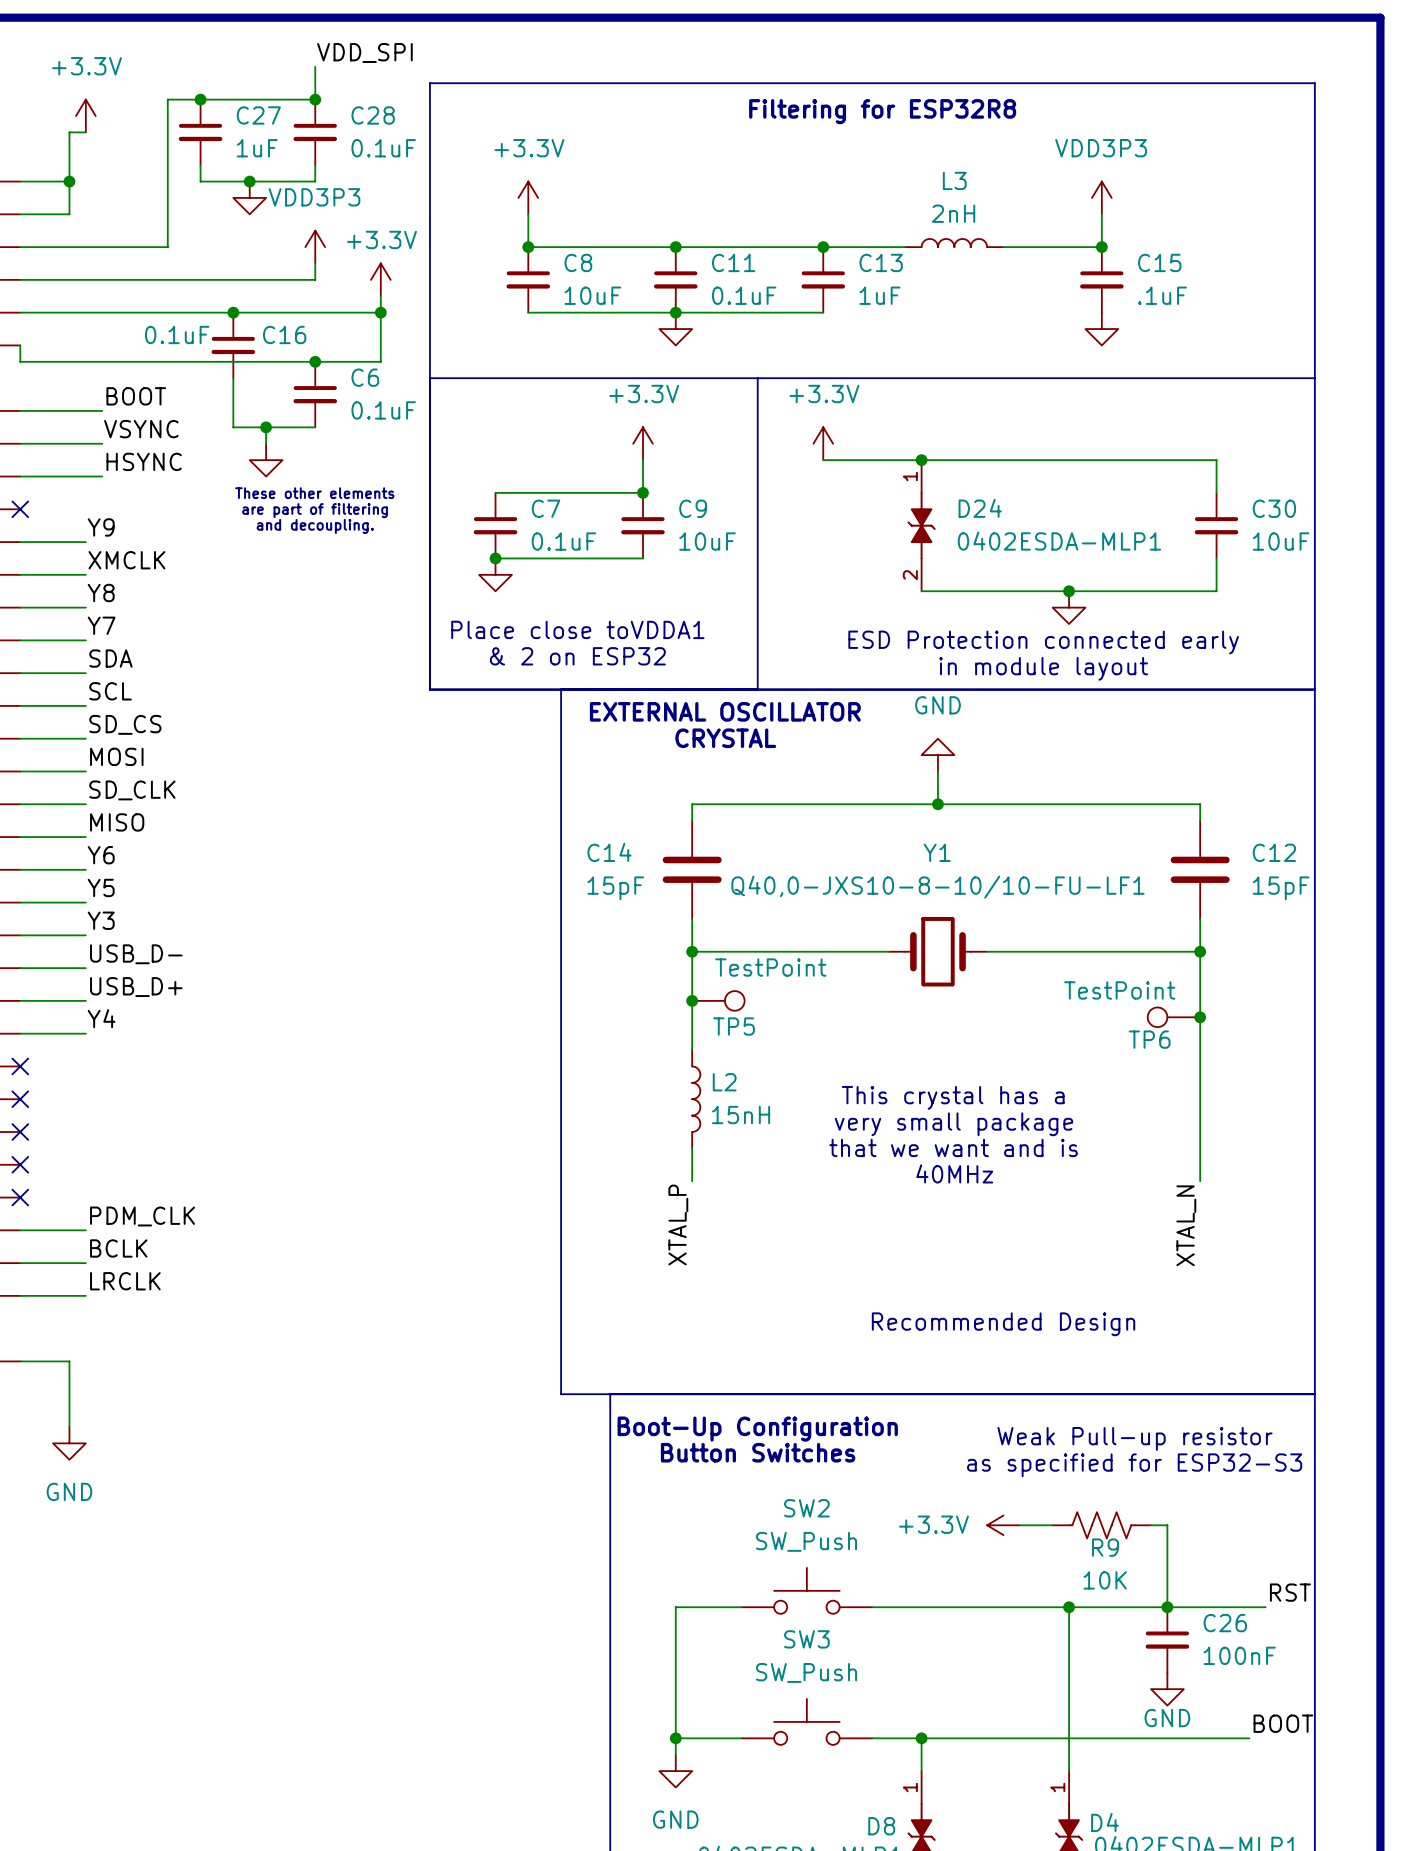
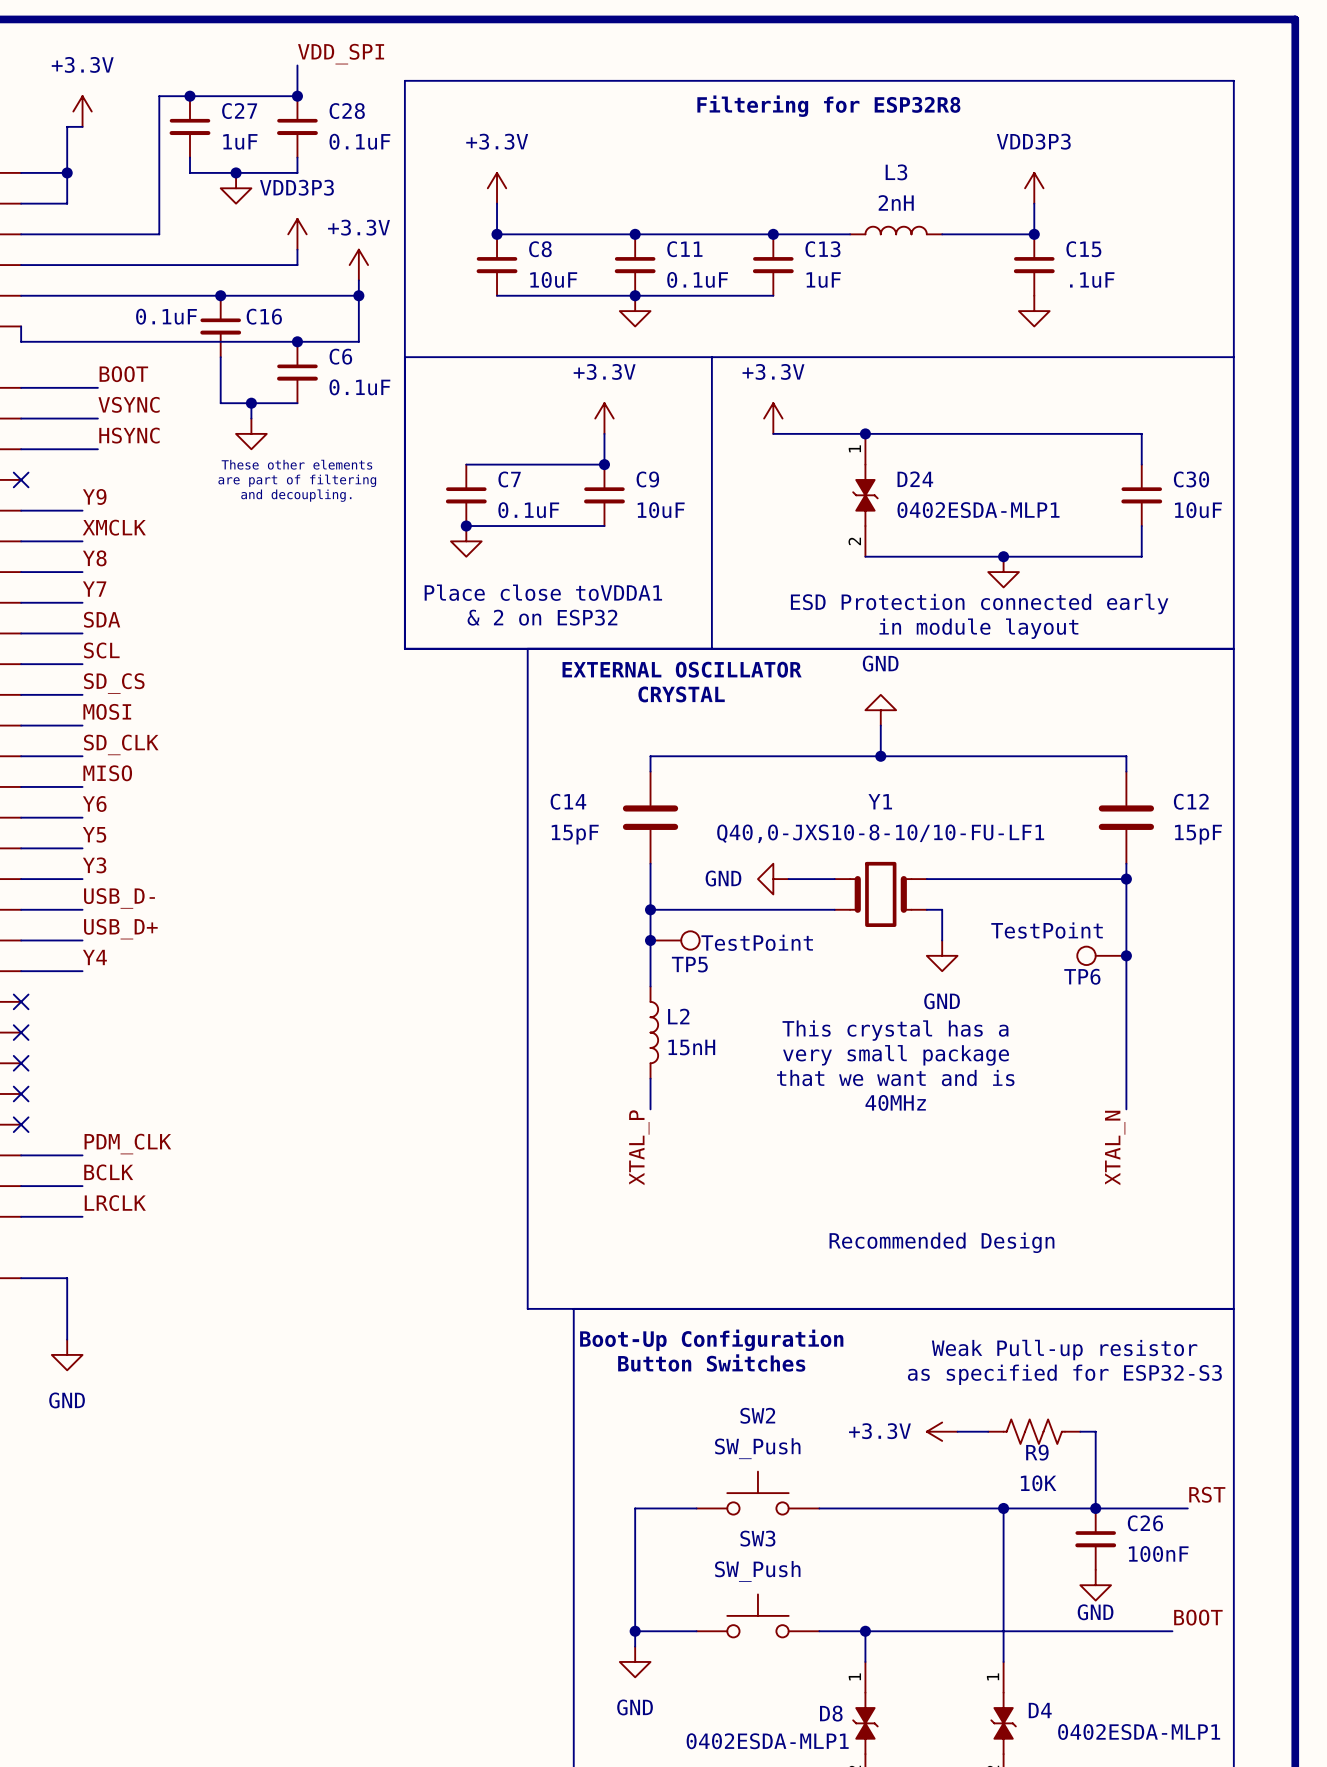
Y1 symbol: [888, 917, 988, 987] -> [834, 861, 927, 927]
power symbol: none -> GND (773, 879)
wire: none -> (788, 879) (834, 879)
wire: (692, 951) (888, 951) -> (650, 909) (834, 909)
junction position: (692, 951) -> (650, 909)
wire: (987, 951) (1200, 951) -> (926, 879) (1126, 879)
junction position: (1200, 951) -> (1126, 879)
TP5 value position: TestPoint (770, 967) -> TestPoint (757, 942)
wire: none -> (926, 909) (942, 909) (942, 940)
power symbol: none -> GND (942, 955)

